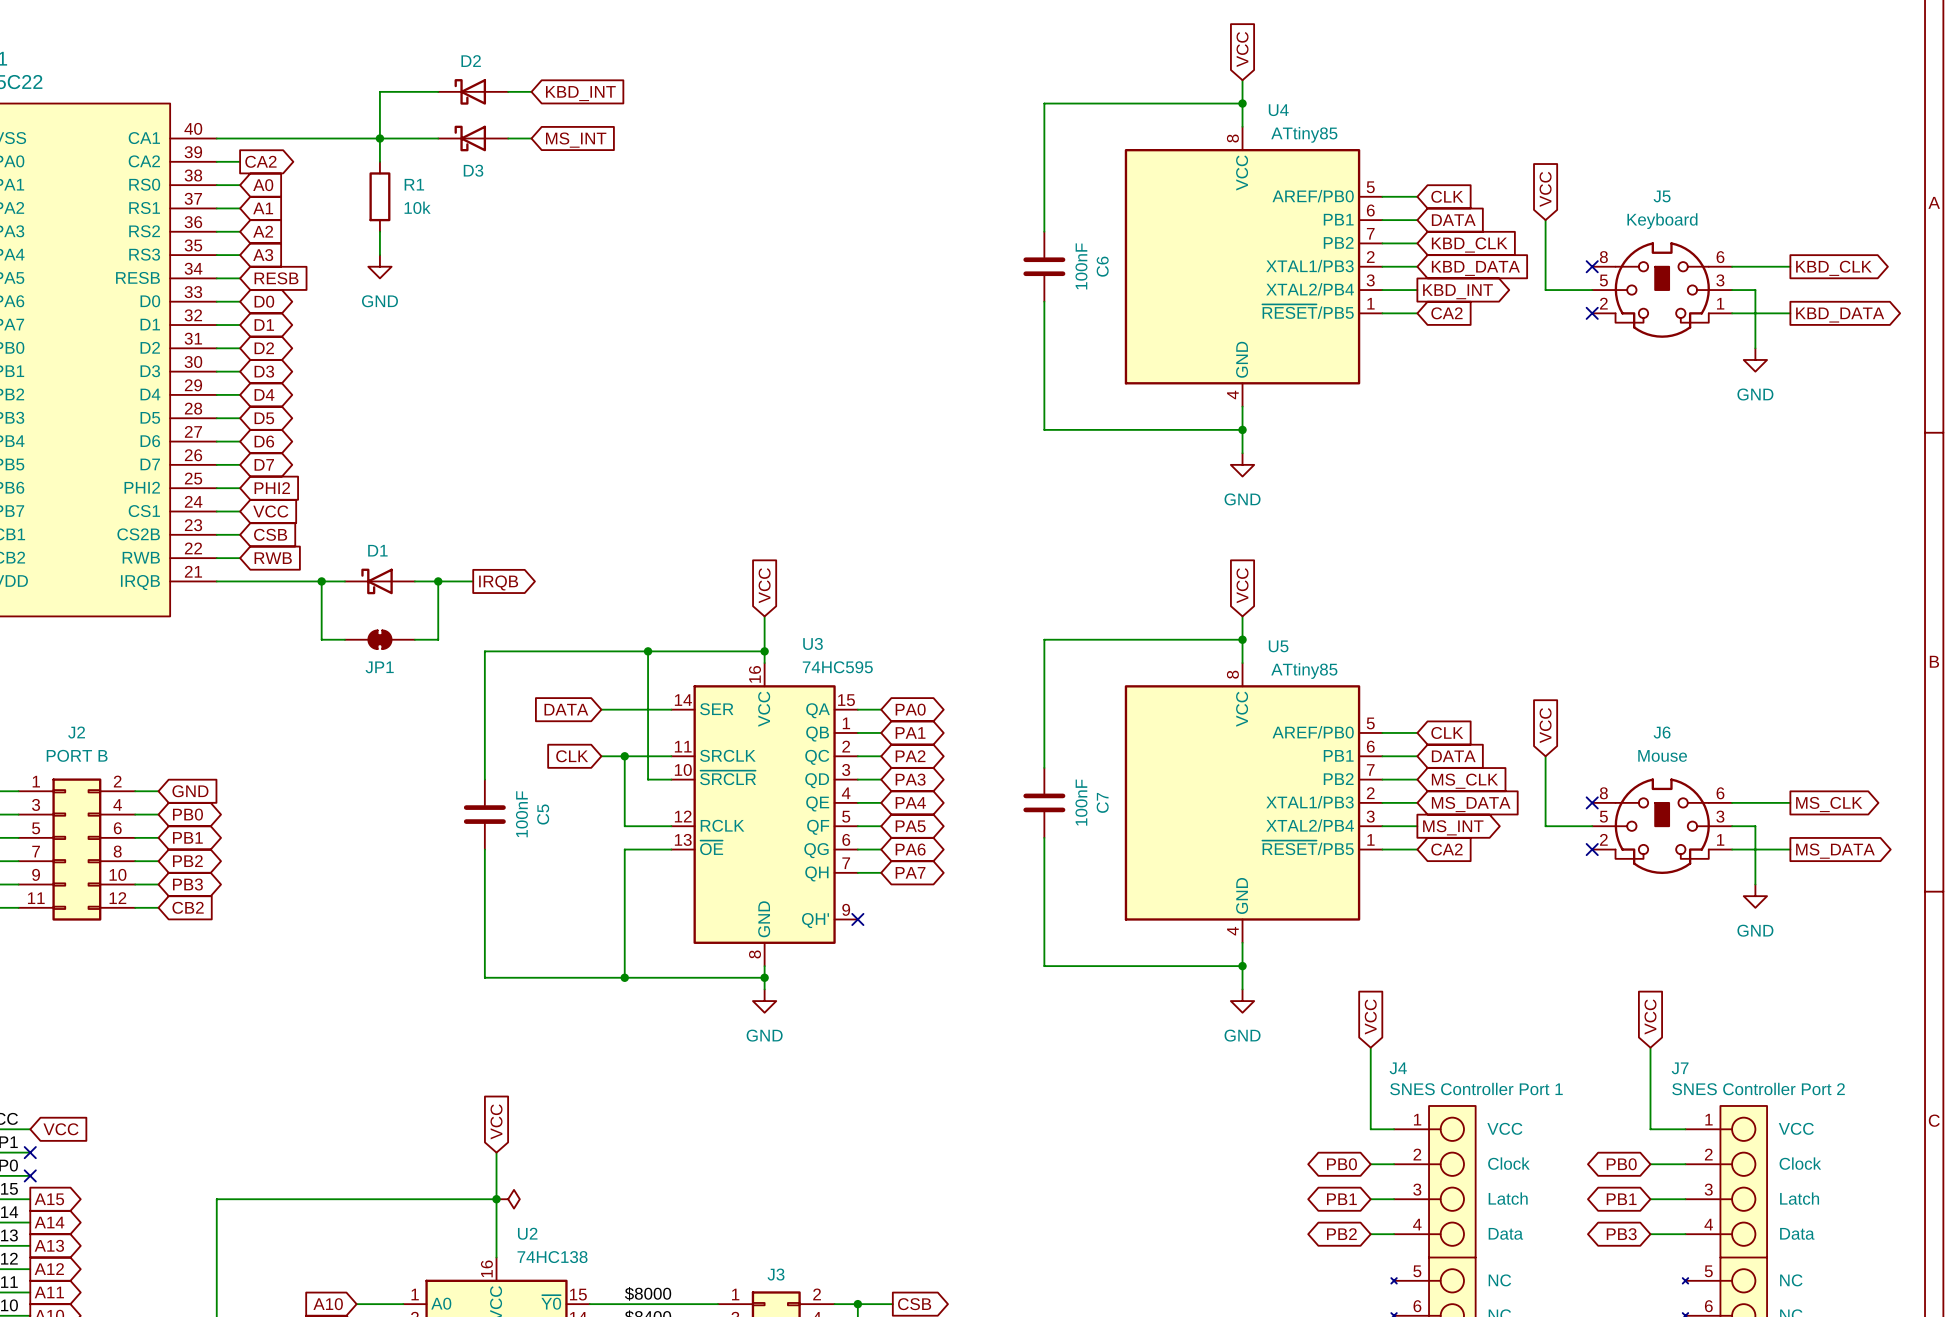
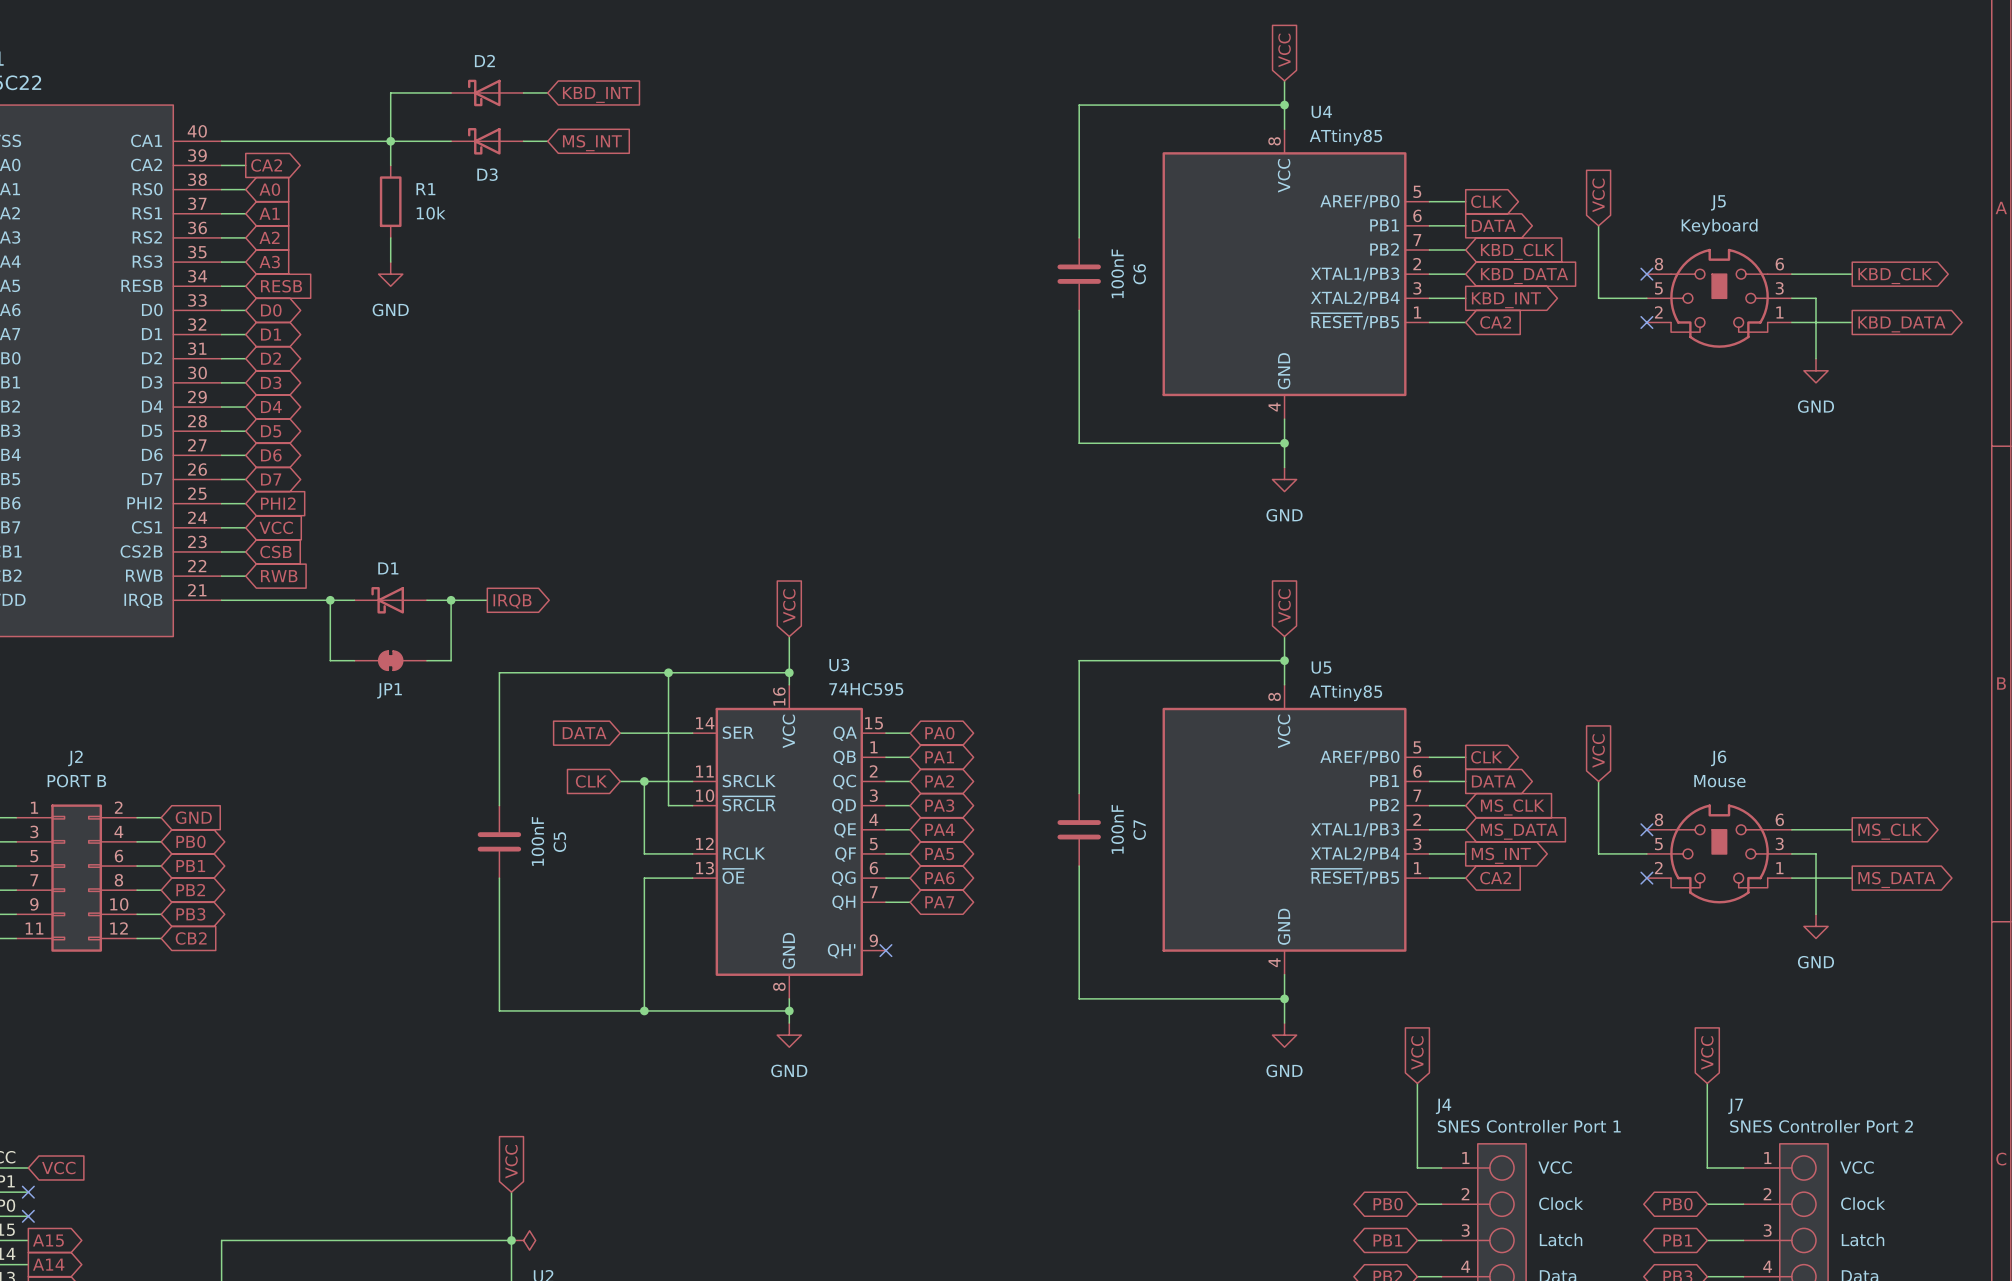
global label shape: input (1447, 196) -> output (1486, 201)
global label shape: input (1453, 220) -> output (1493, 225)
global label shape: input (1447, 732) -> output (1486, 757)
global label shape: input (1453, 756) -> output (1493, 781)

